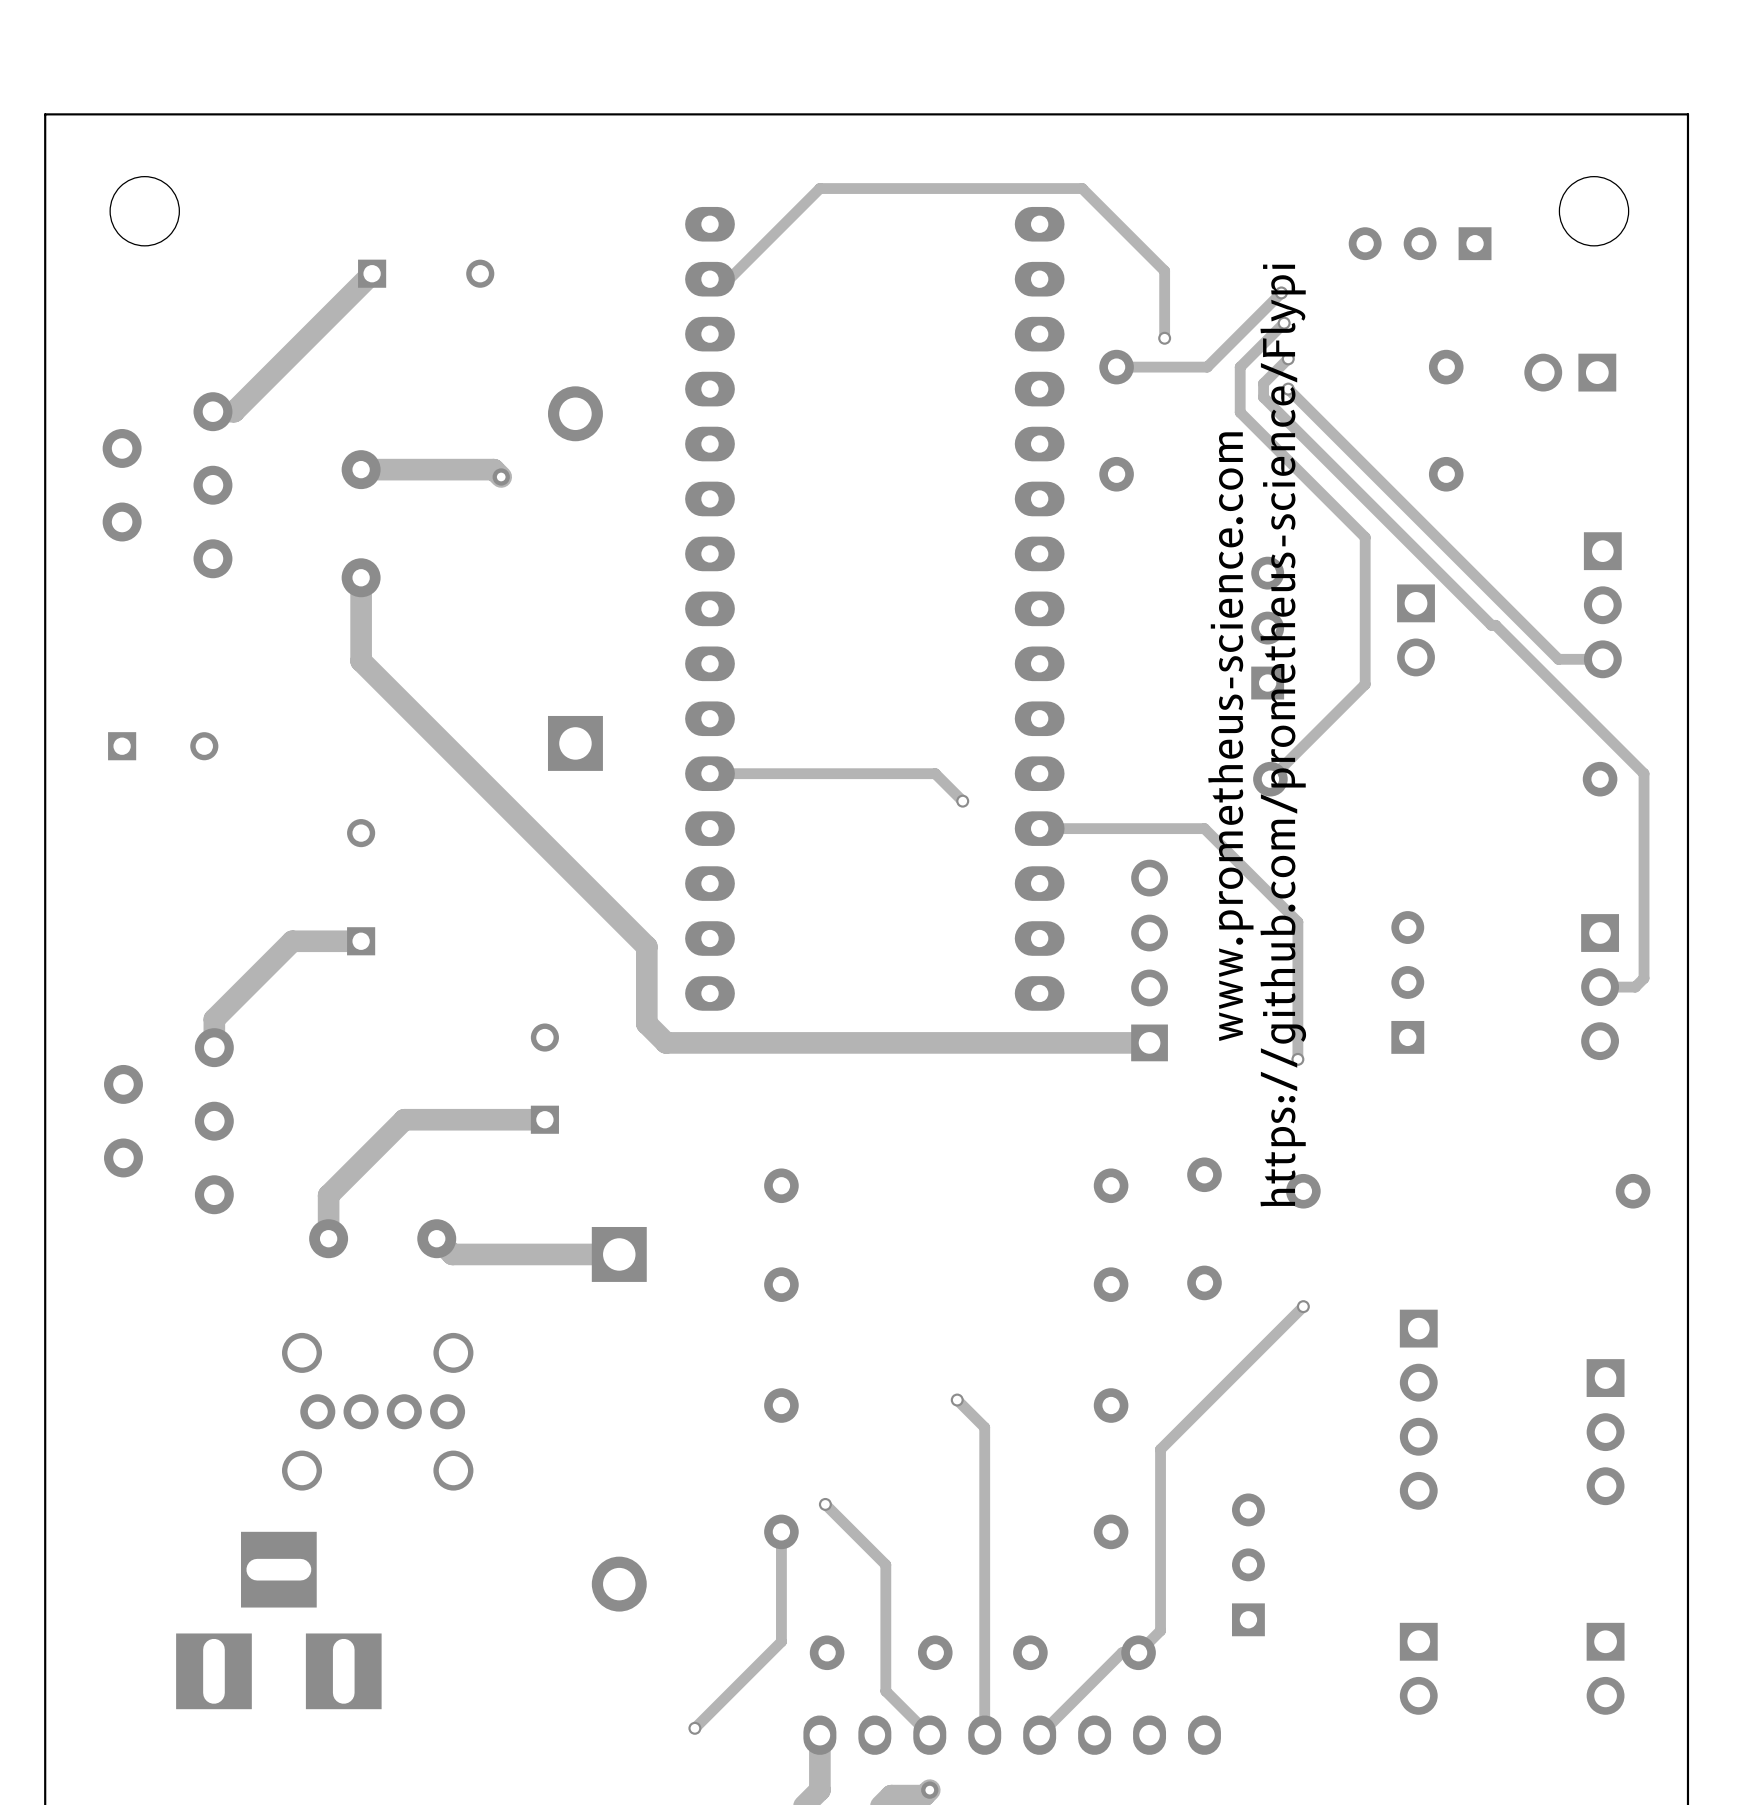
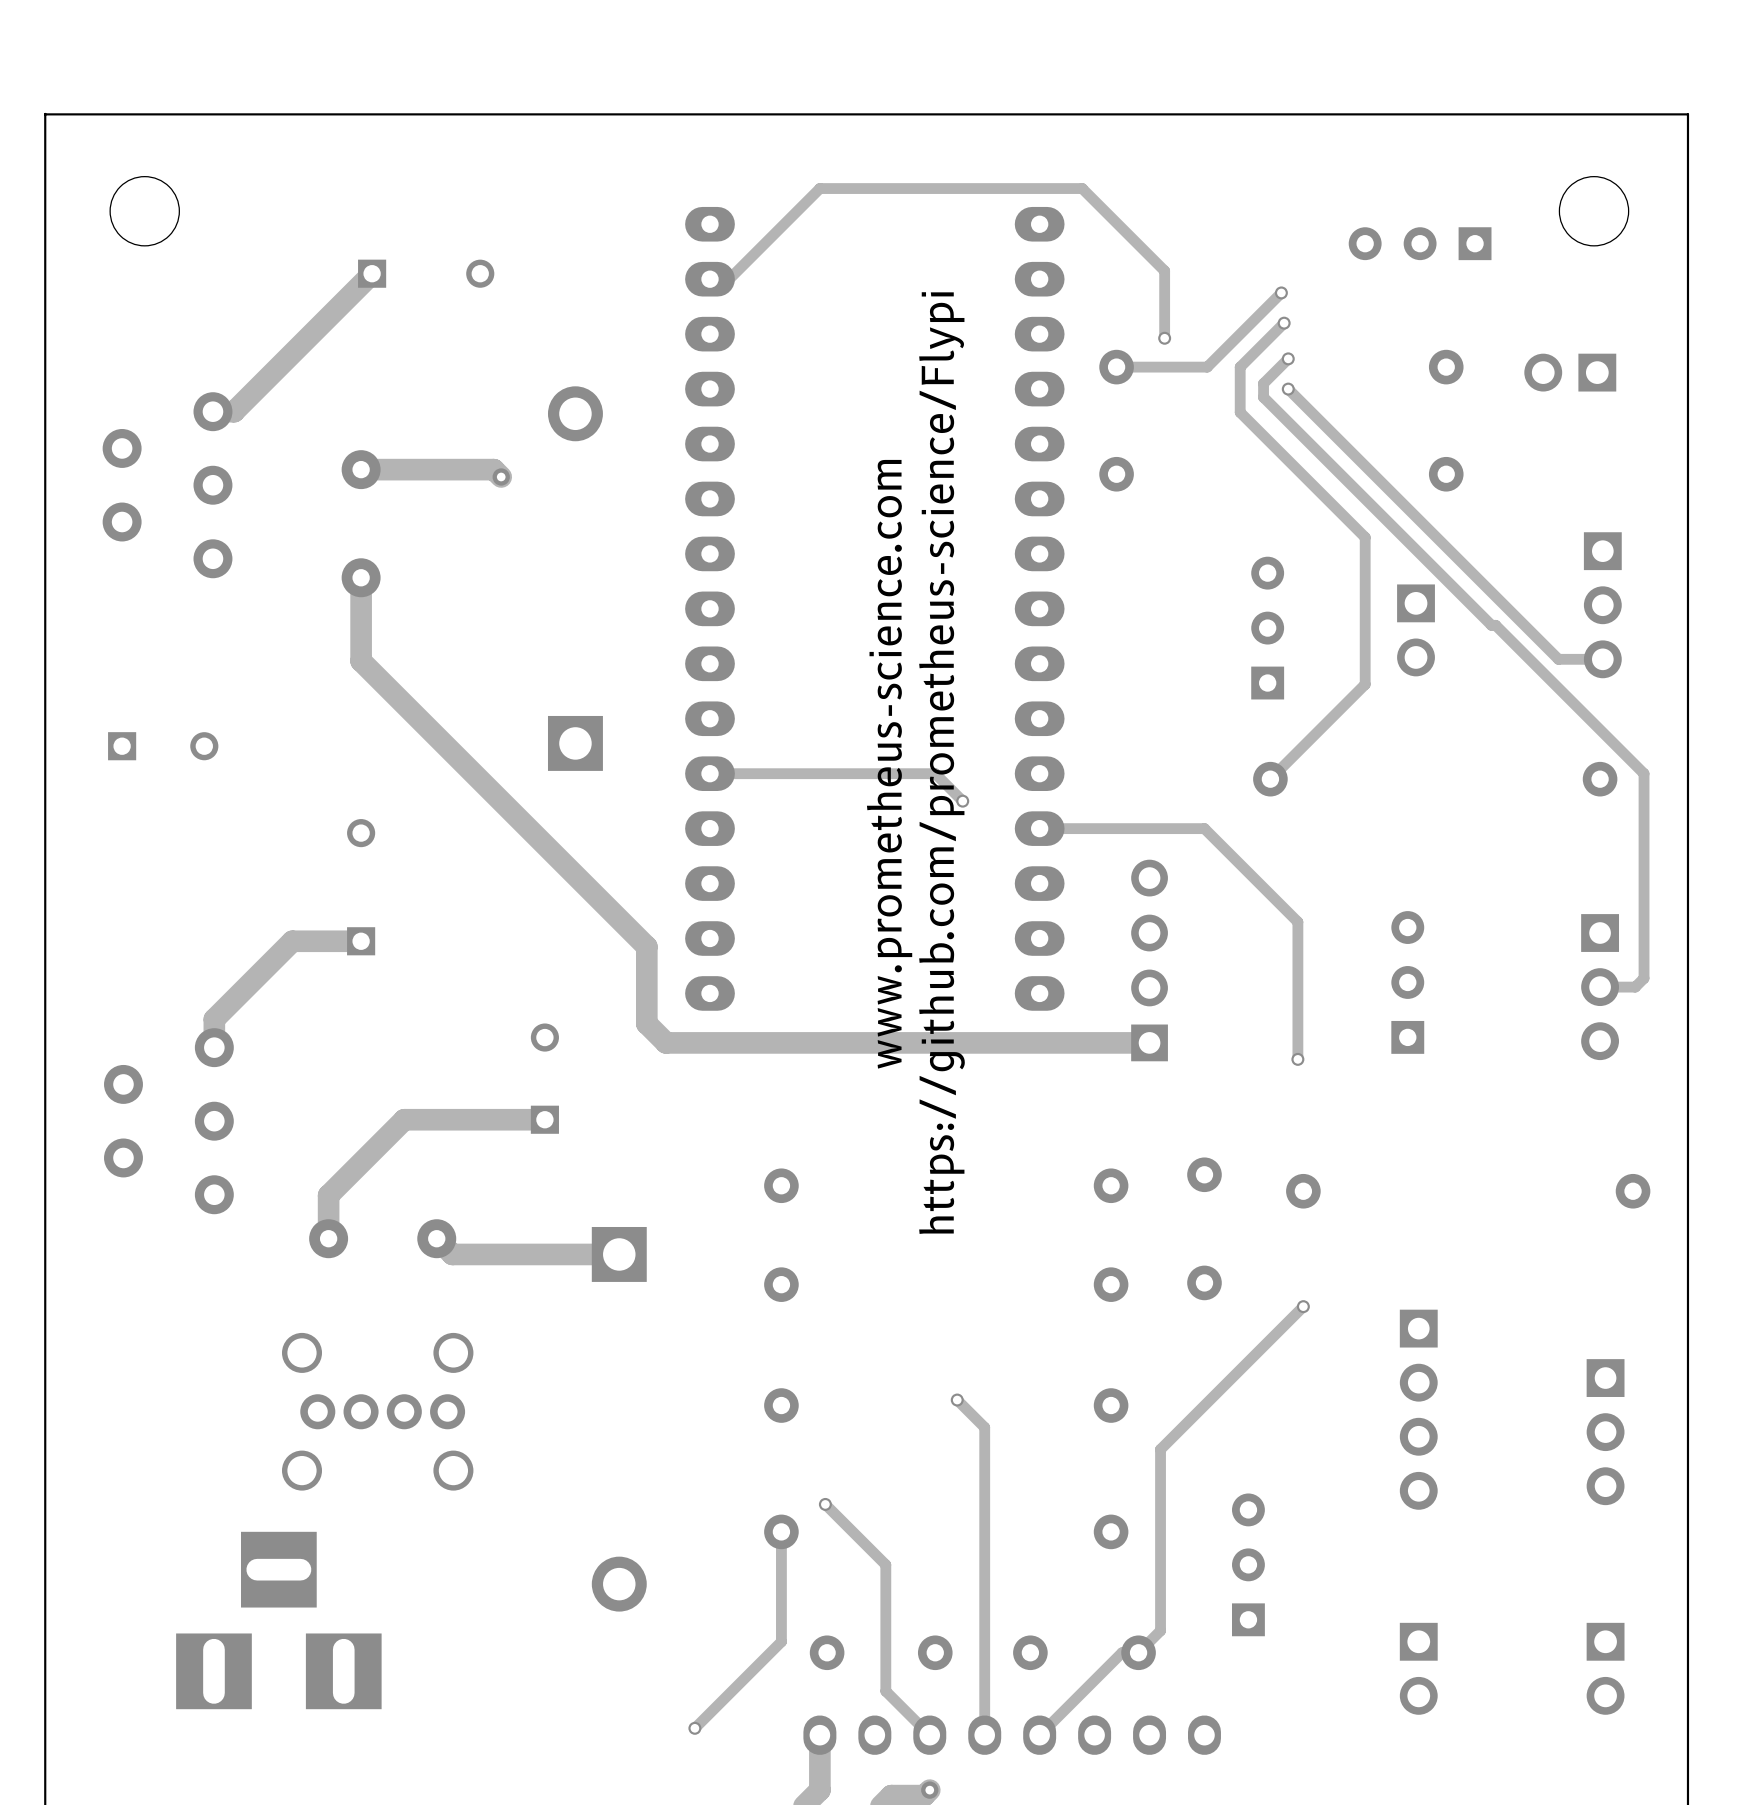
text position: https://github.com/prometheus-science/Flypi (1283, 735) -> https://github.com/prometheus-science/Flypi (942, 763)
text position: www.prometheus-science.com (1230, 736) -> www.prometheus-science.com (889, 764)

